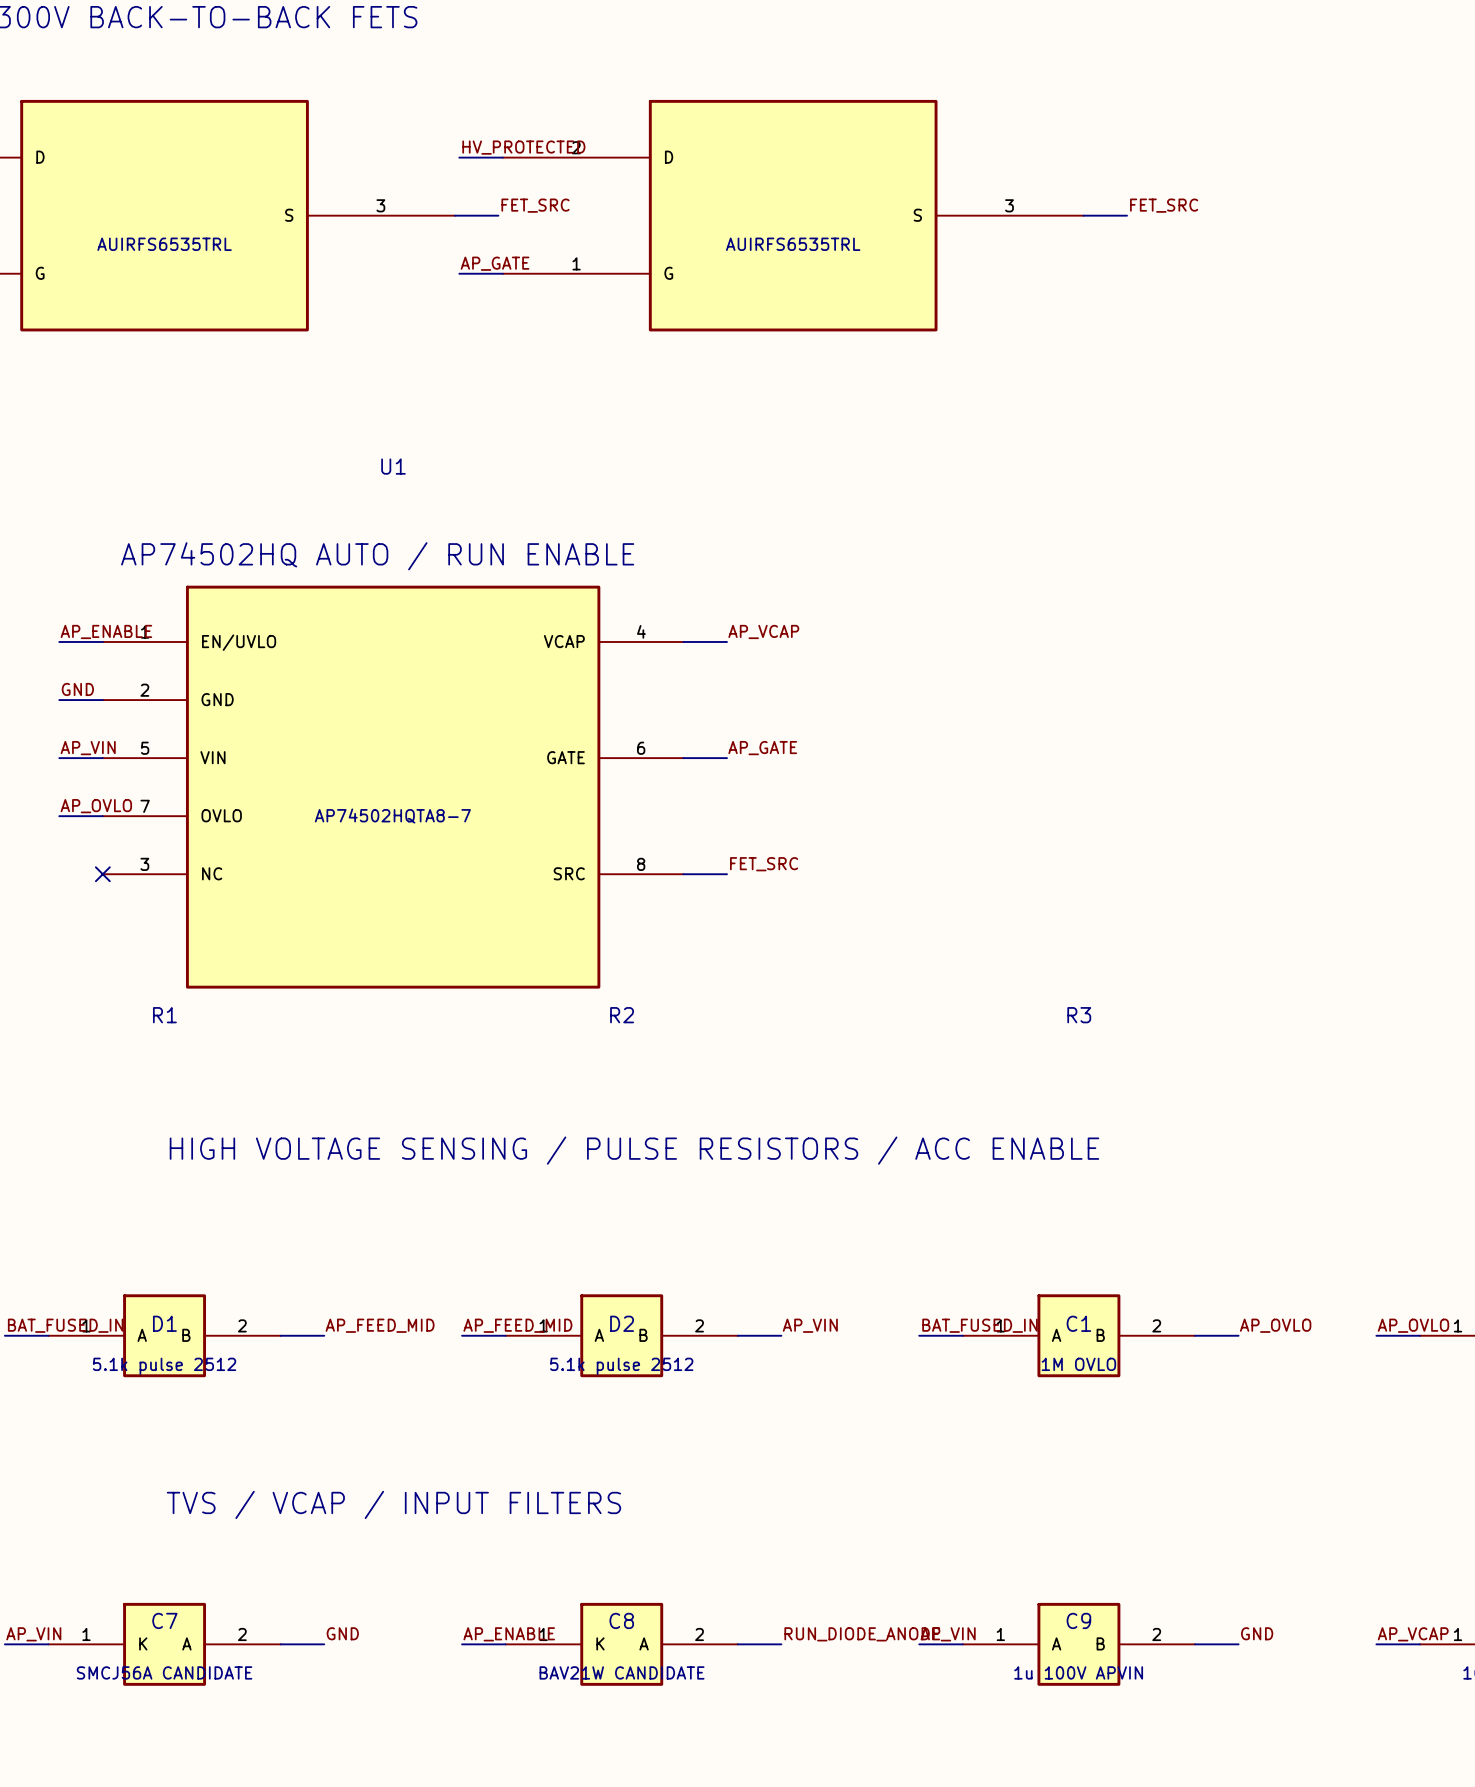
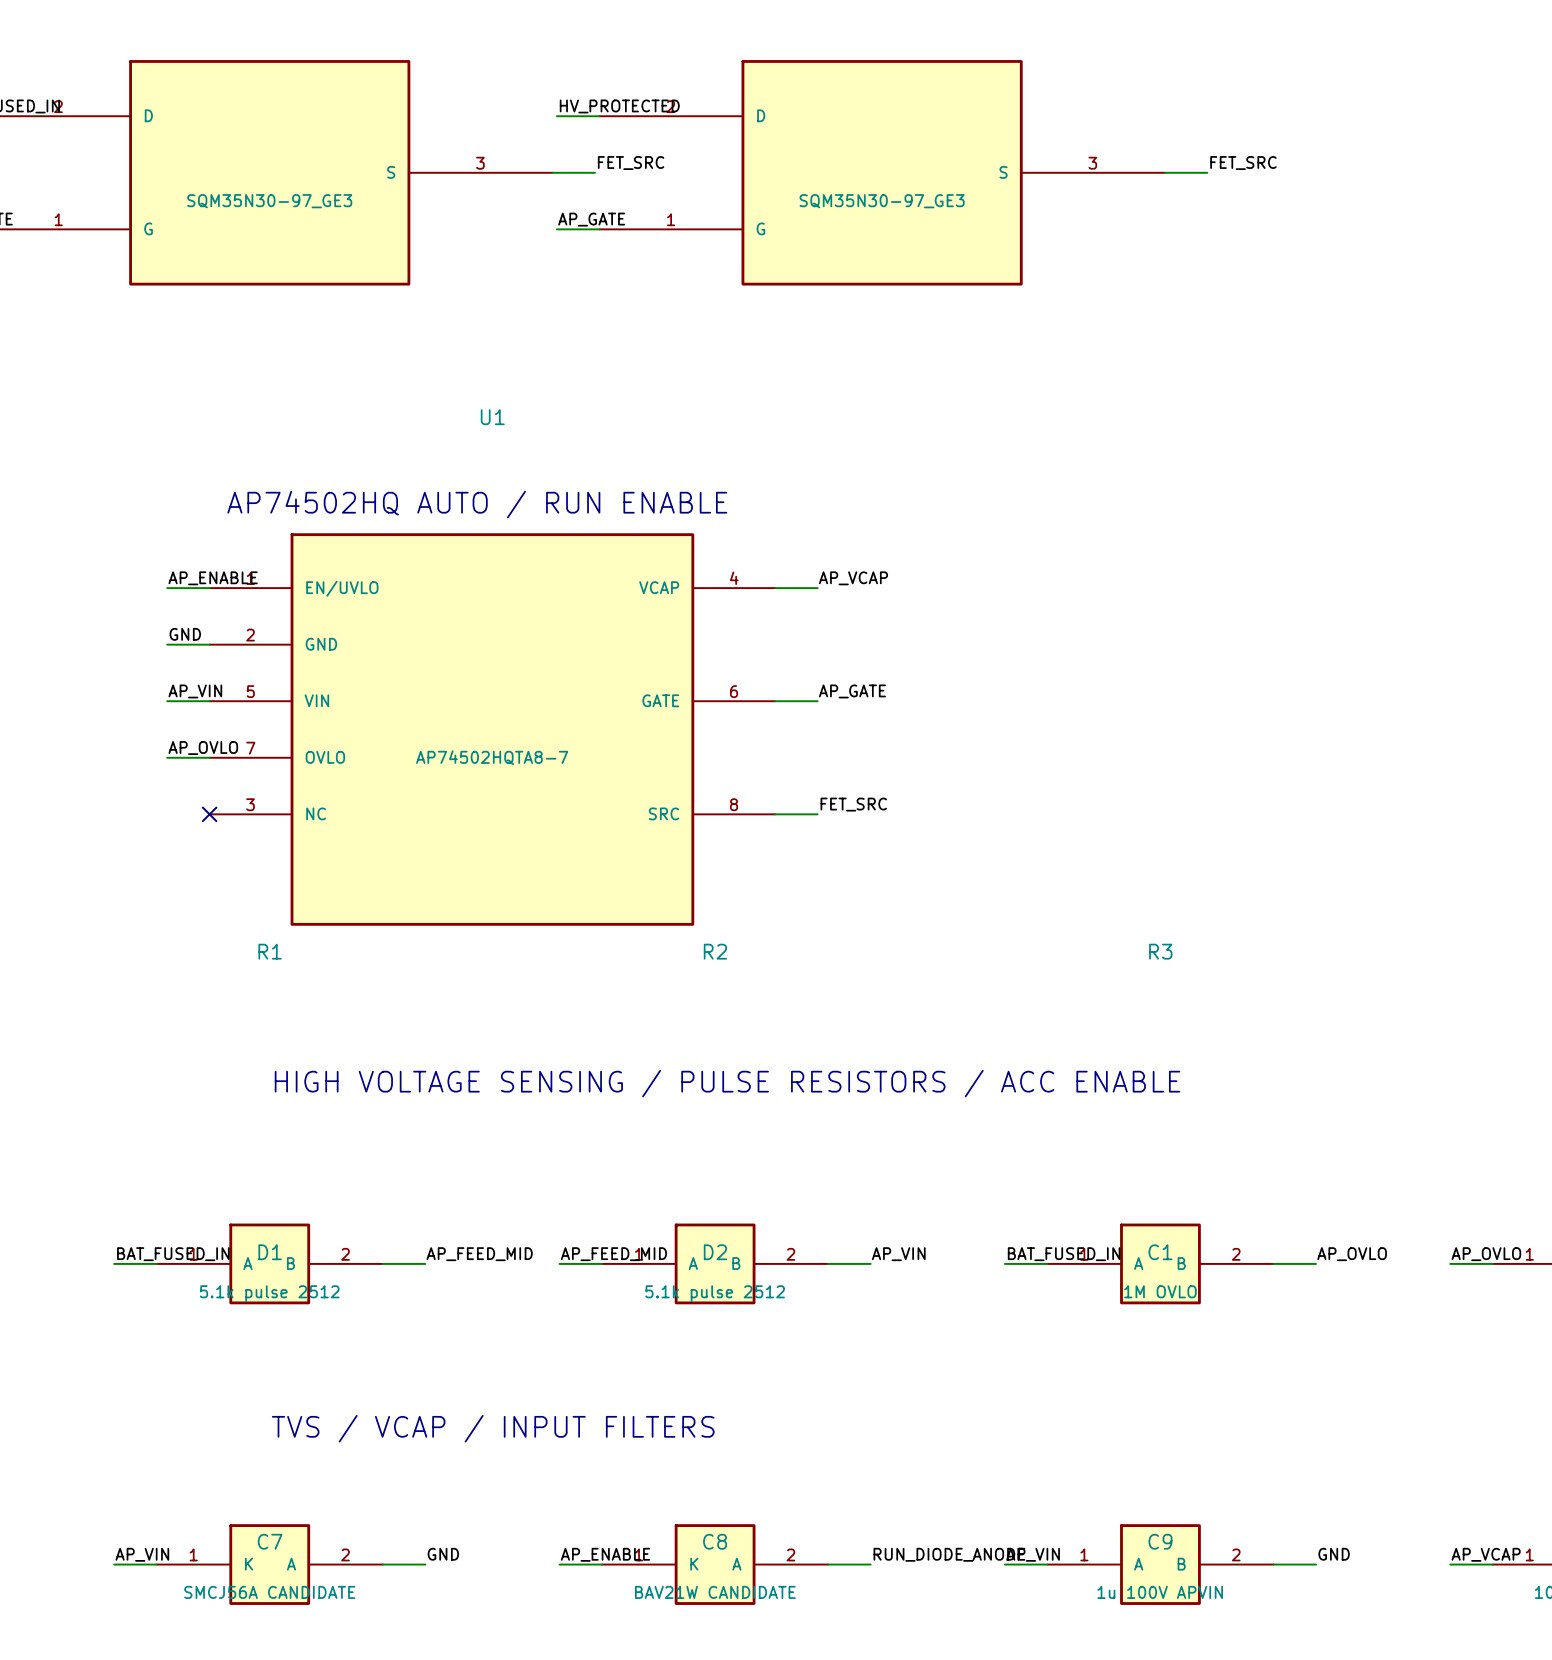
part value: AUIRFS6535TRL (164, 244) -> SQM35N30-97_GE3 (269, 201)
part value: AUIRFS6535TRL (793, 244) -> SQM35N30-97_GE3 (882, 201)

